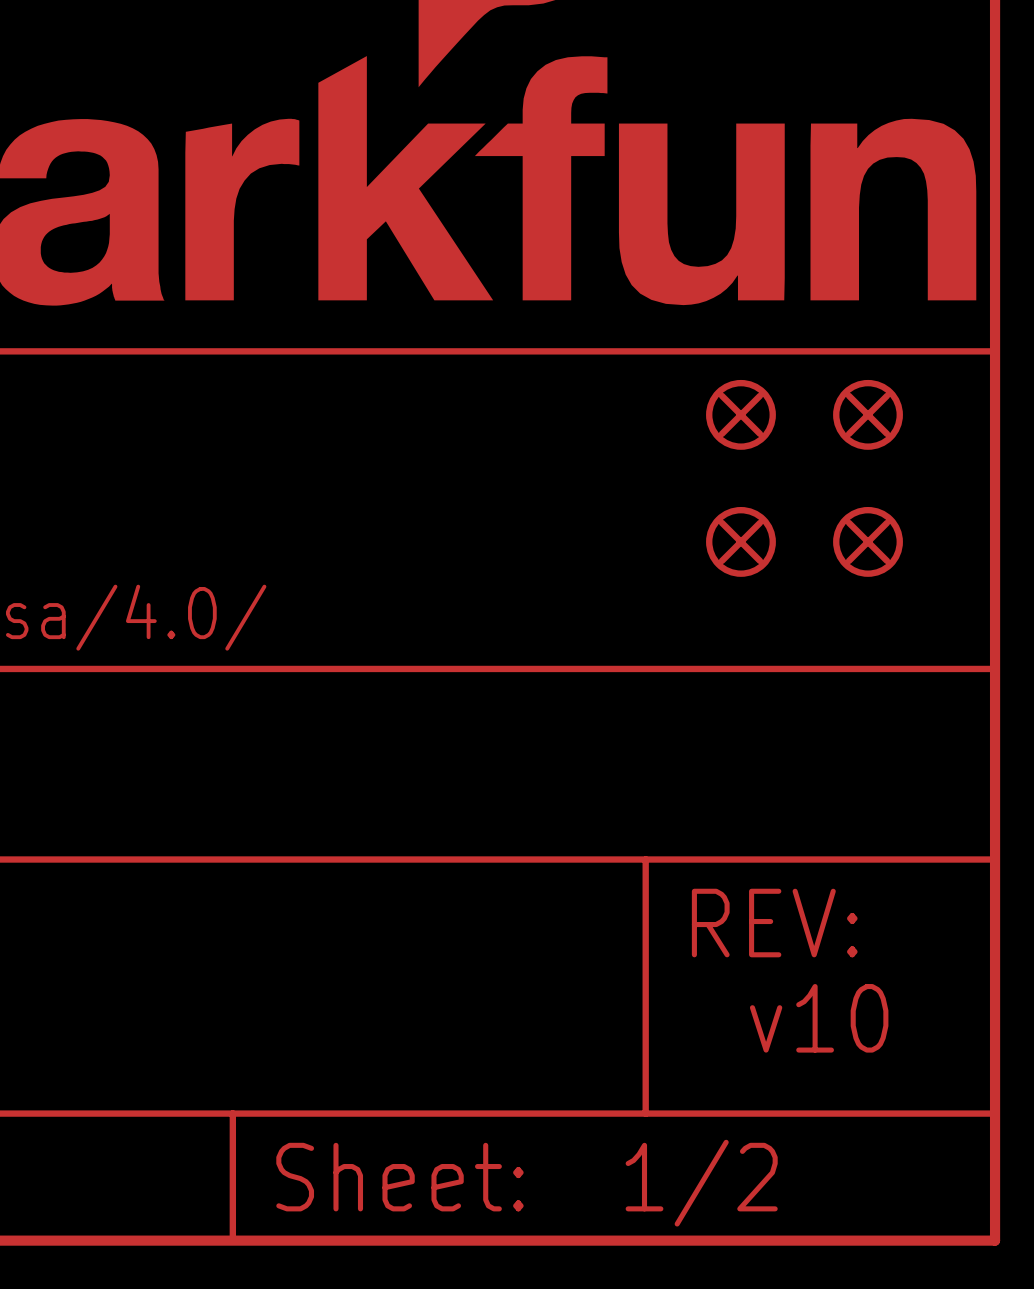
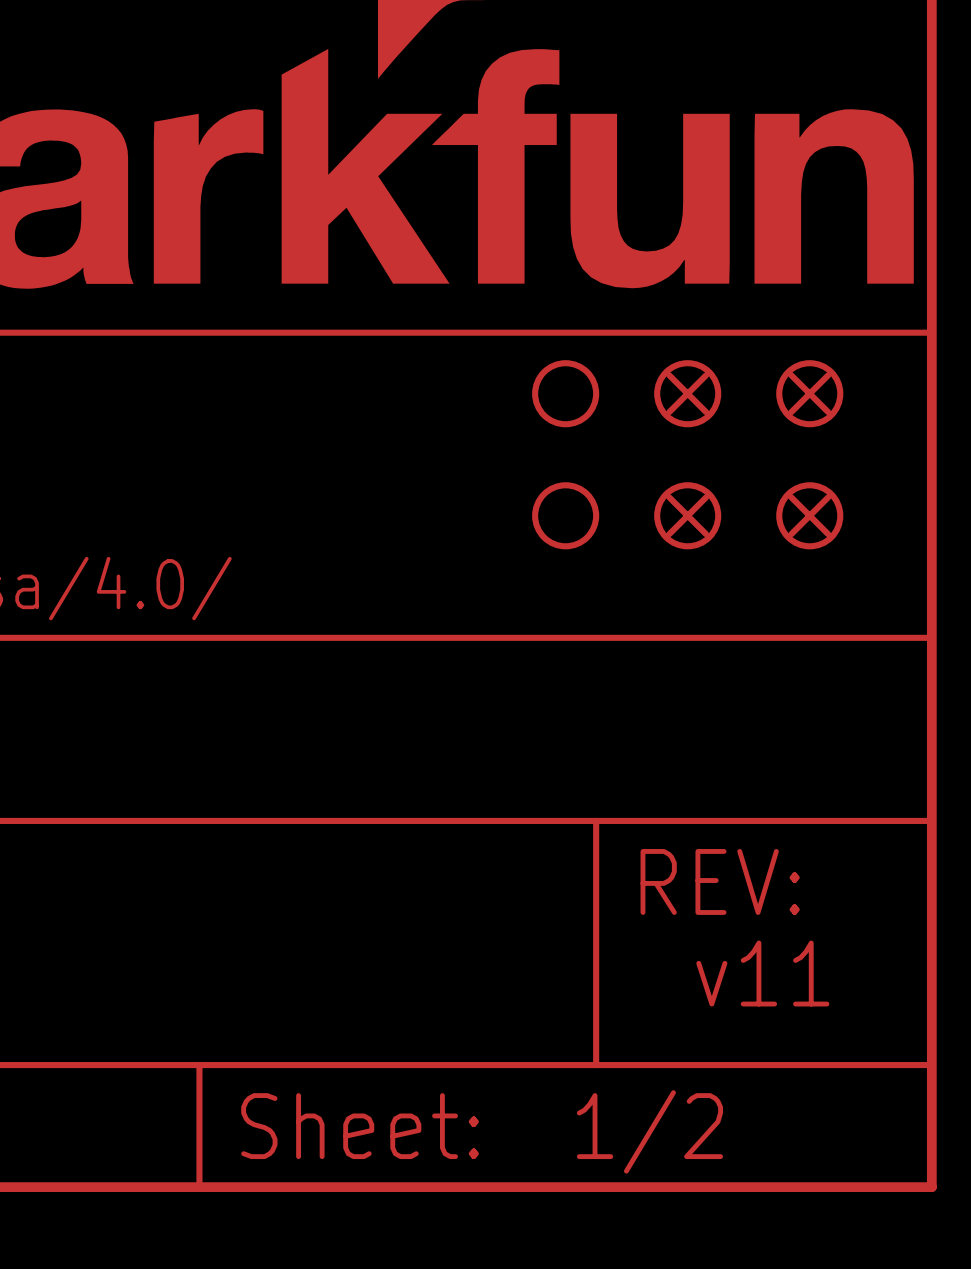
part: none -> (565, 393)
part: none -> (565, 515)
text: v10 (819, 1018) -> v11 (762, 973)

